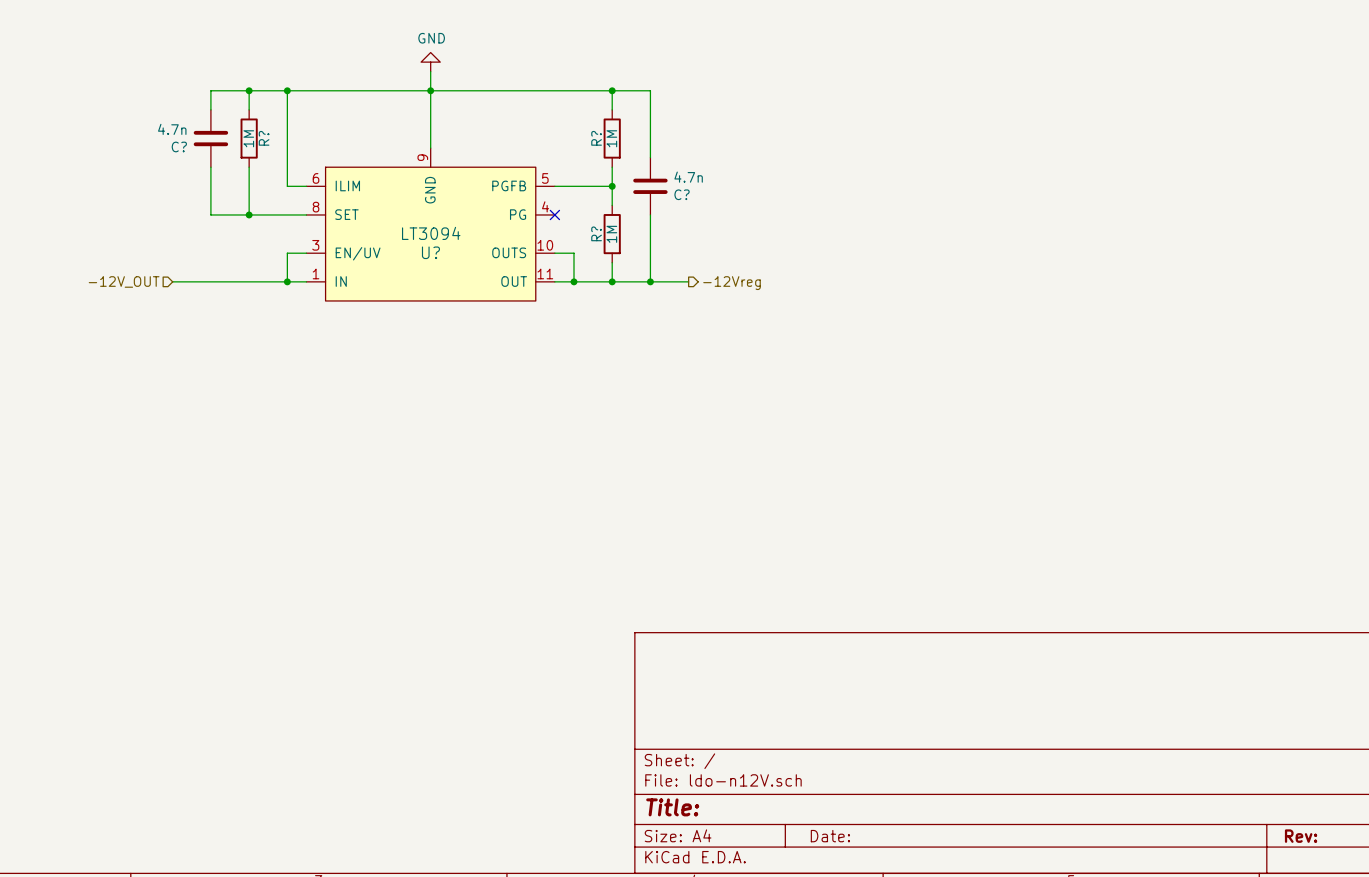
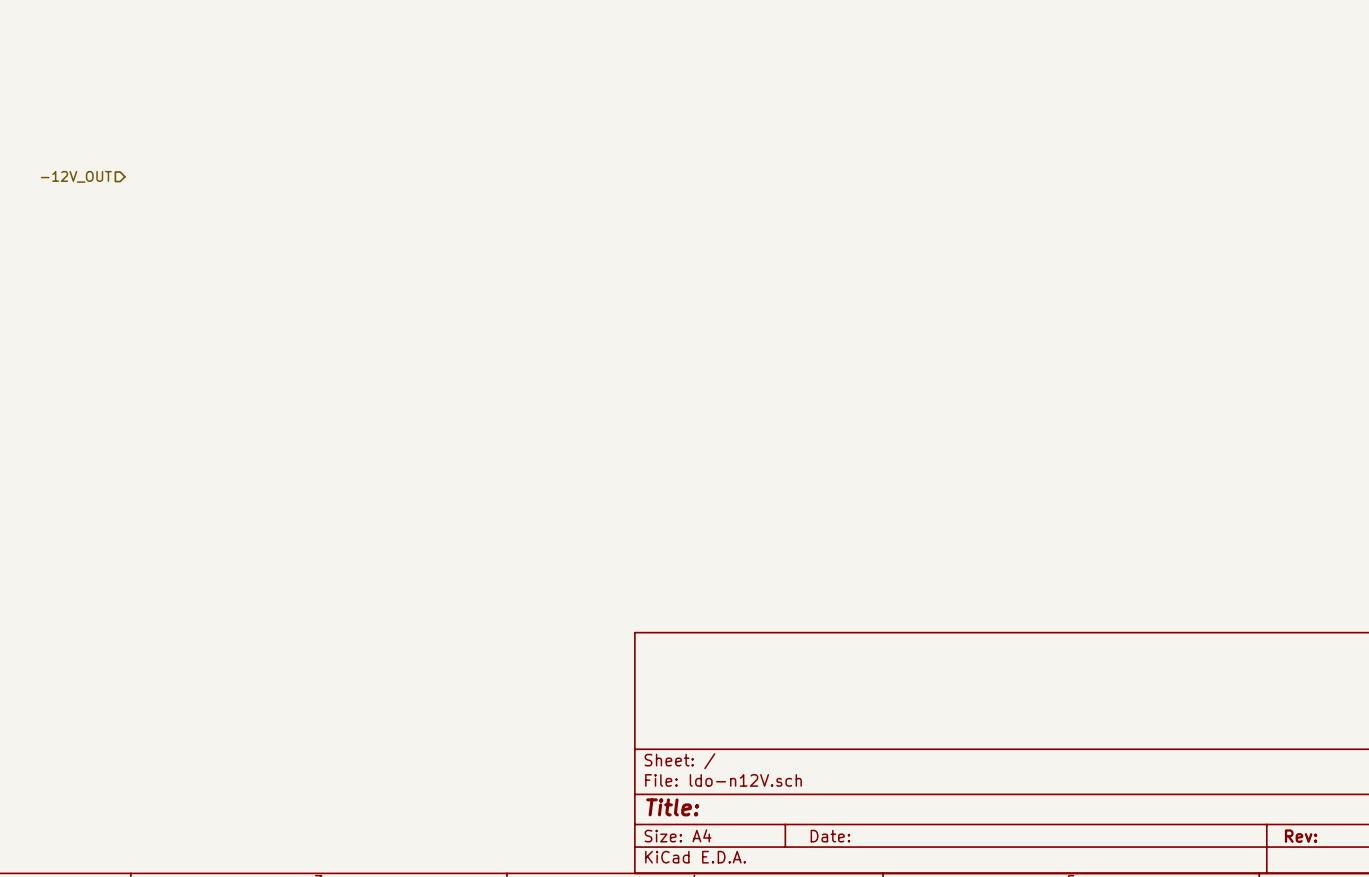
power symbol: GND (430, 62) -> none
wire: (430, 71) (430, 148) -> none
wire: (249, 90) (249, 109) -> none
junction: (249, 90) -> none
wire: (287, 90) (287, 186) (306, 186) -> none
junction: (287, 90) -> none
junction: (430, 90) -> none
wire: (612, 90) (612, 109) -> none
junction: (612, 90) -> none
wire: (210, 109) (210, 90) (650, 90) (650, 157) -> none
C?: 4.7n (210, 138) -> none
R?: 1M (249, 138) -> none
R?: 1M (612, 138) -> none
wire: (210, 167) (210, 214) (306, 214) -> none
wire: (249, 167) (249, 214) -> none
wire: (612, 167) (612, 205) -> none
wire: (554, 186) (612, 186) -> none
junction: (612, 186) -> none
C?: 4.7n (650, 186) -> none
junction: (249, 214) -> none
no-connect mark: (554, 214) -> none
wire: (650, 214) (650, 281) -> none
U?: LT3094 (430, 224) -> none
R?: 1M (612, 234) -> none
wire: (306, 253) (287, 253) (287, 281) -> none
wire: (554, 253) (573, 253) (573, 281) -> none
wire: (612, 262) (612, 281) -> none
hierarchical label position: -12V_OUT (124, 281) -> -12V_OUT (76, 176)
wire: (172, 281) (306, 281) -> none
junction: (287, 281) -> none
wire: (554, 281) (688, 281) -> none
junction: (573, 281) -> none
junction: (612, 281) -> none
junction: (650, 281) -> none
hierarchical label: -12Vreg (732, 283) -> none

